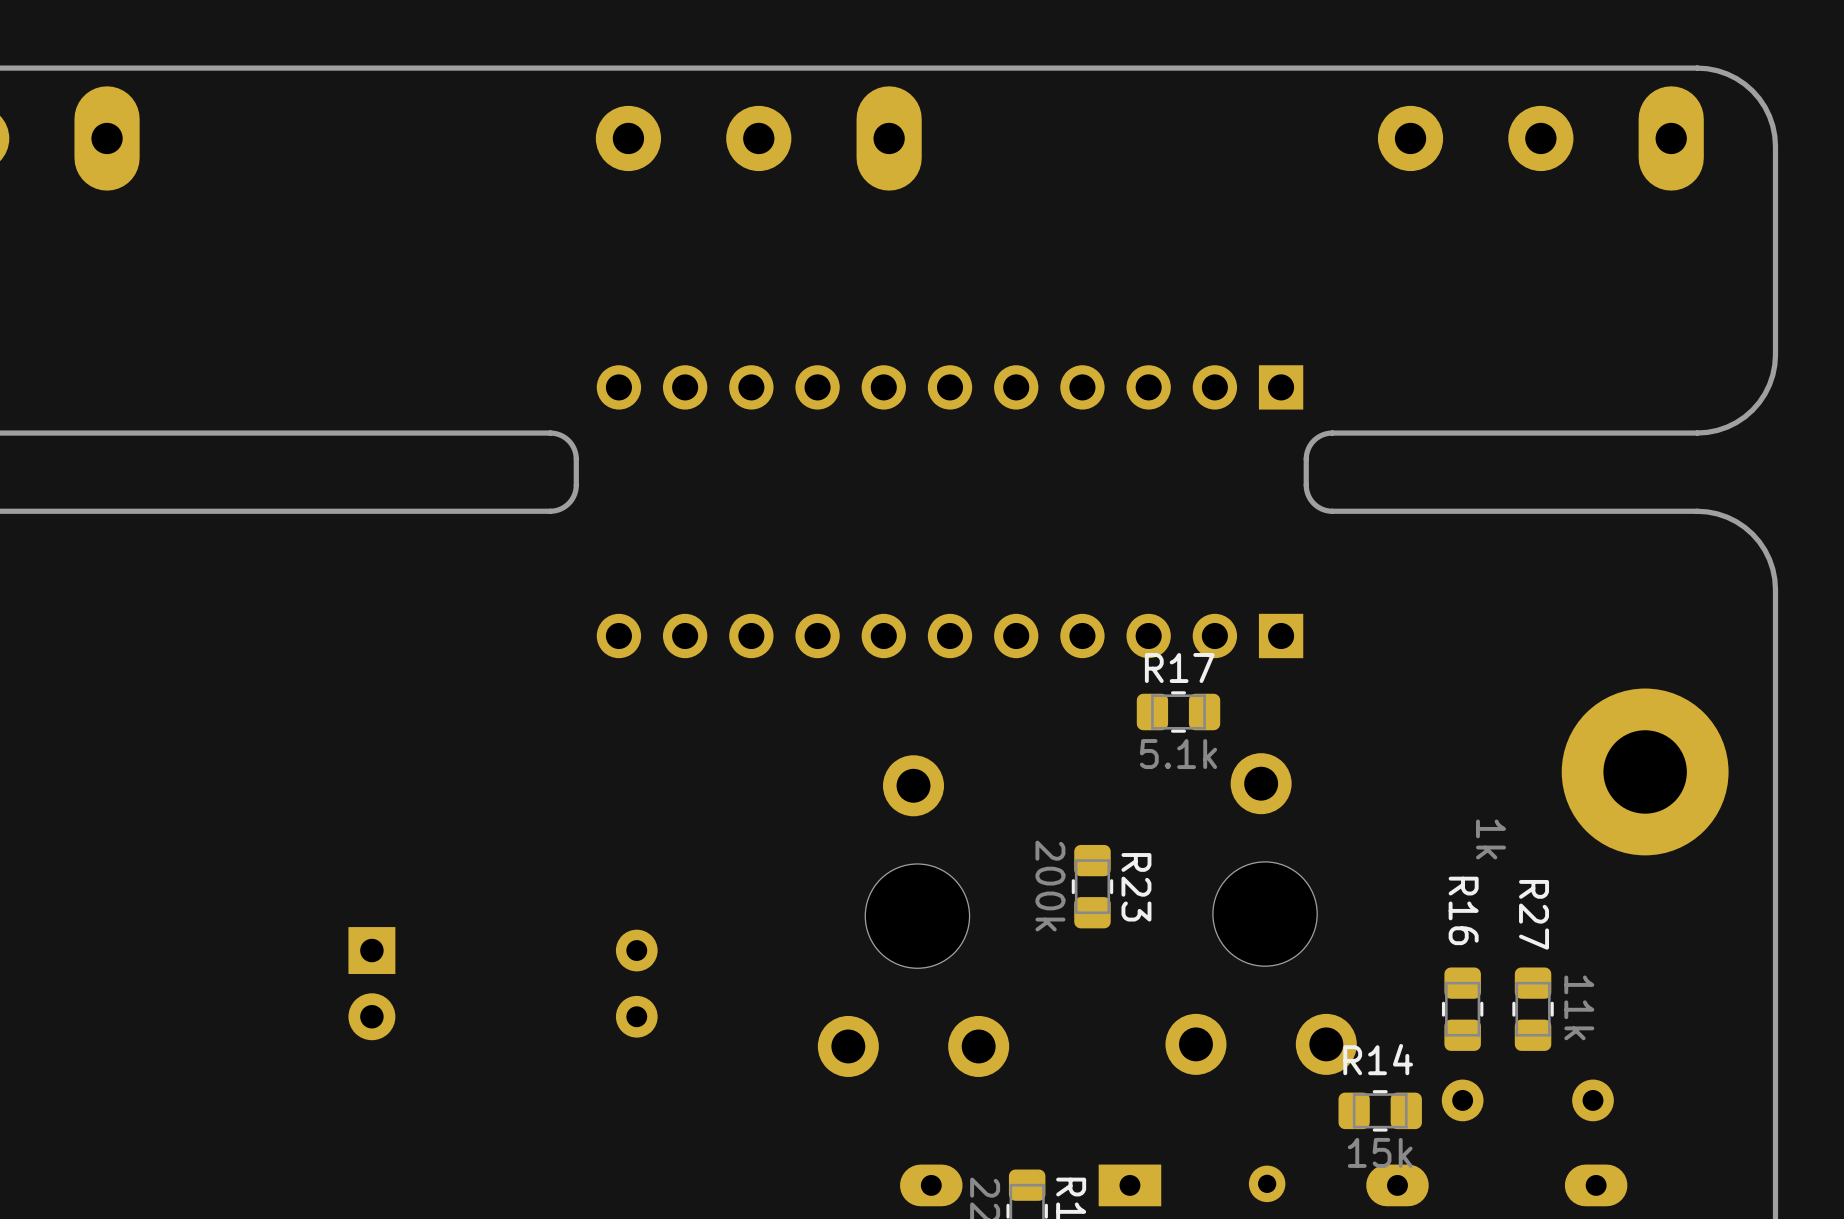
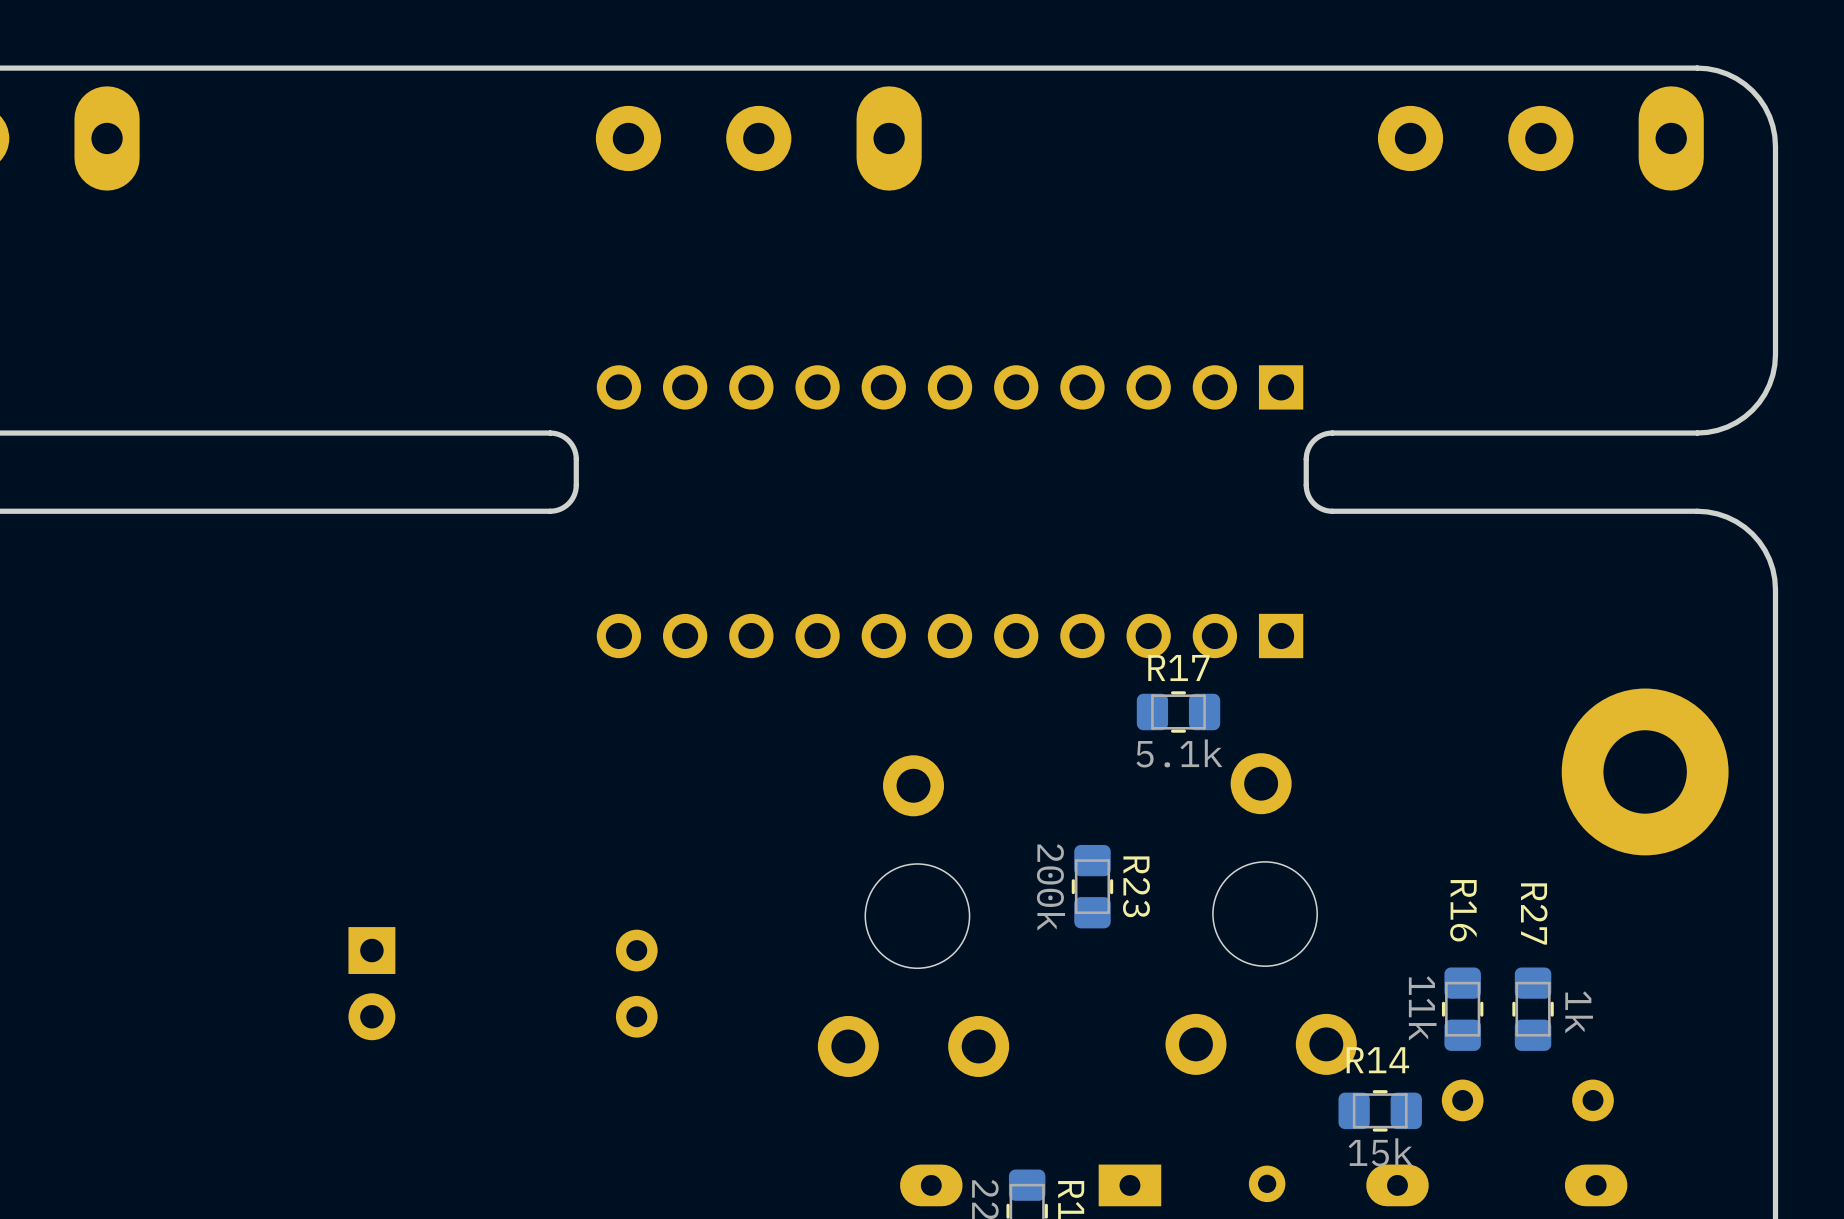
R27 value position: 1k (1491, 839) -> 1k (1579, 1012)
R16 value position: 11k (1579, 1007) -> 11k (1422, 1008)

